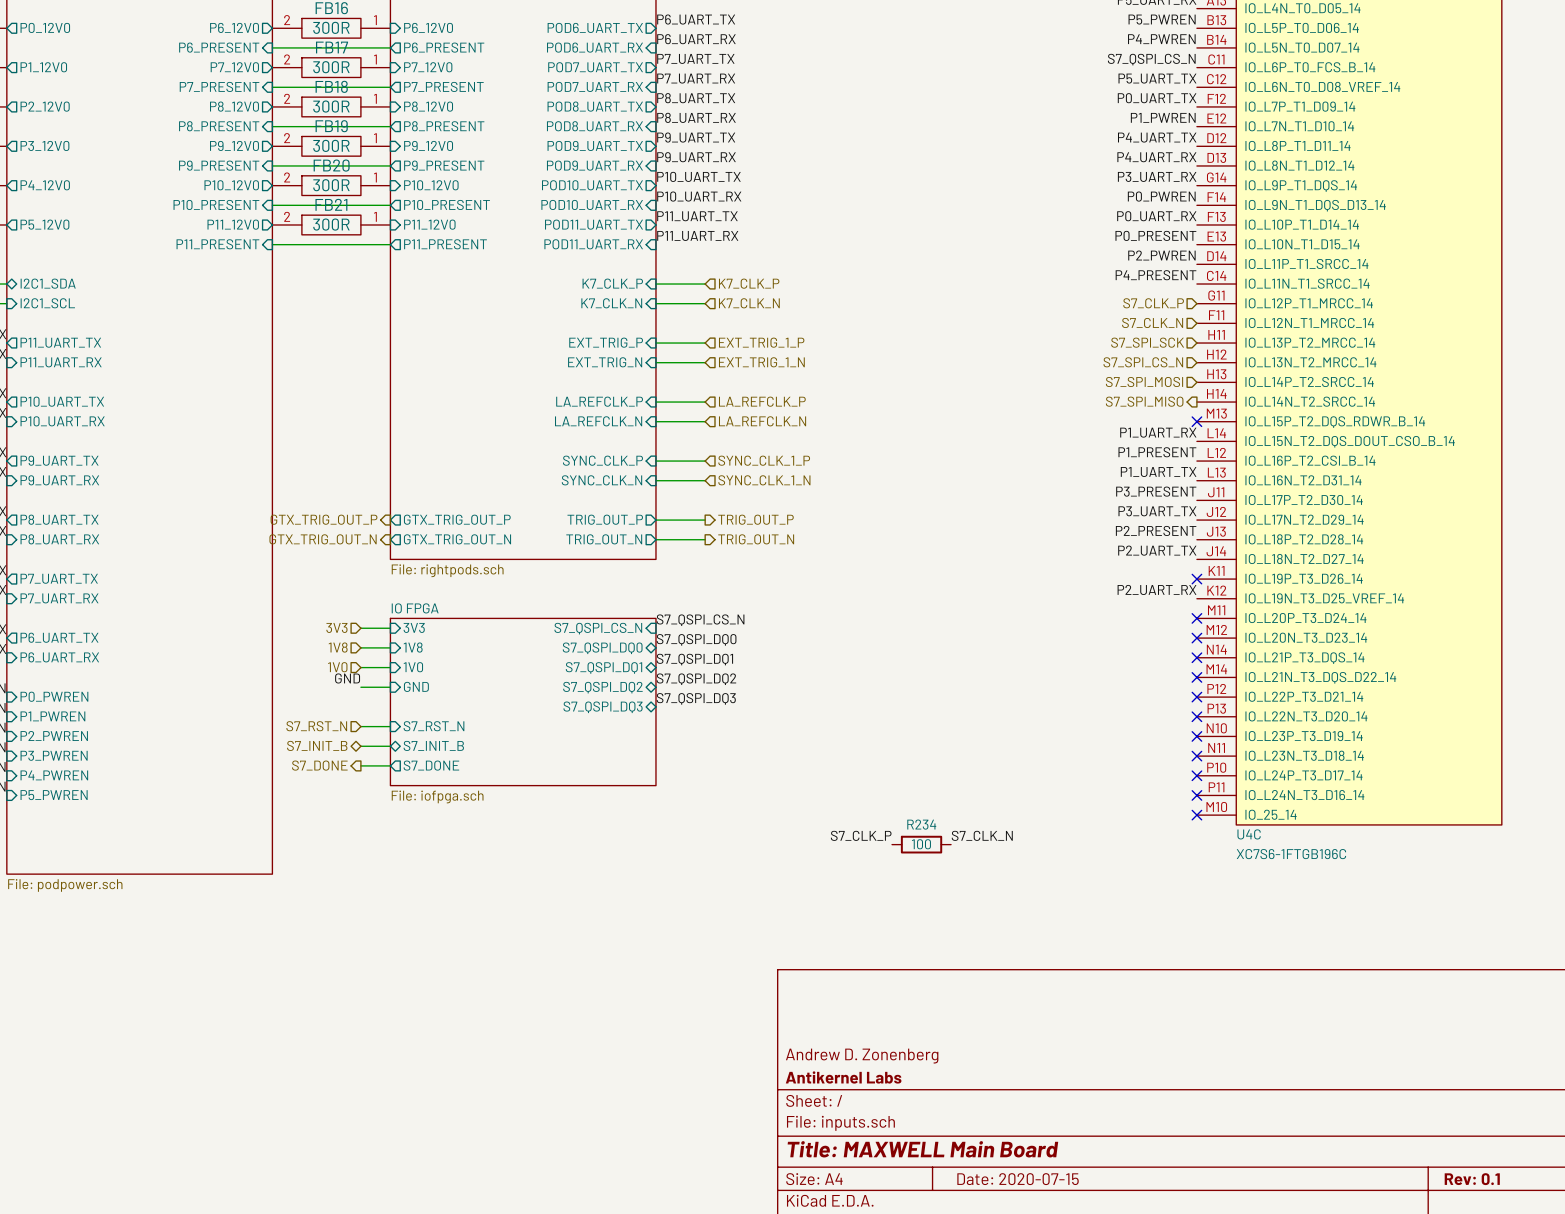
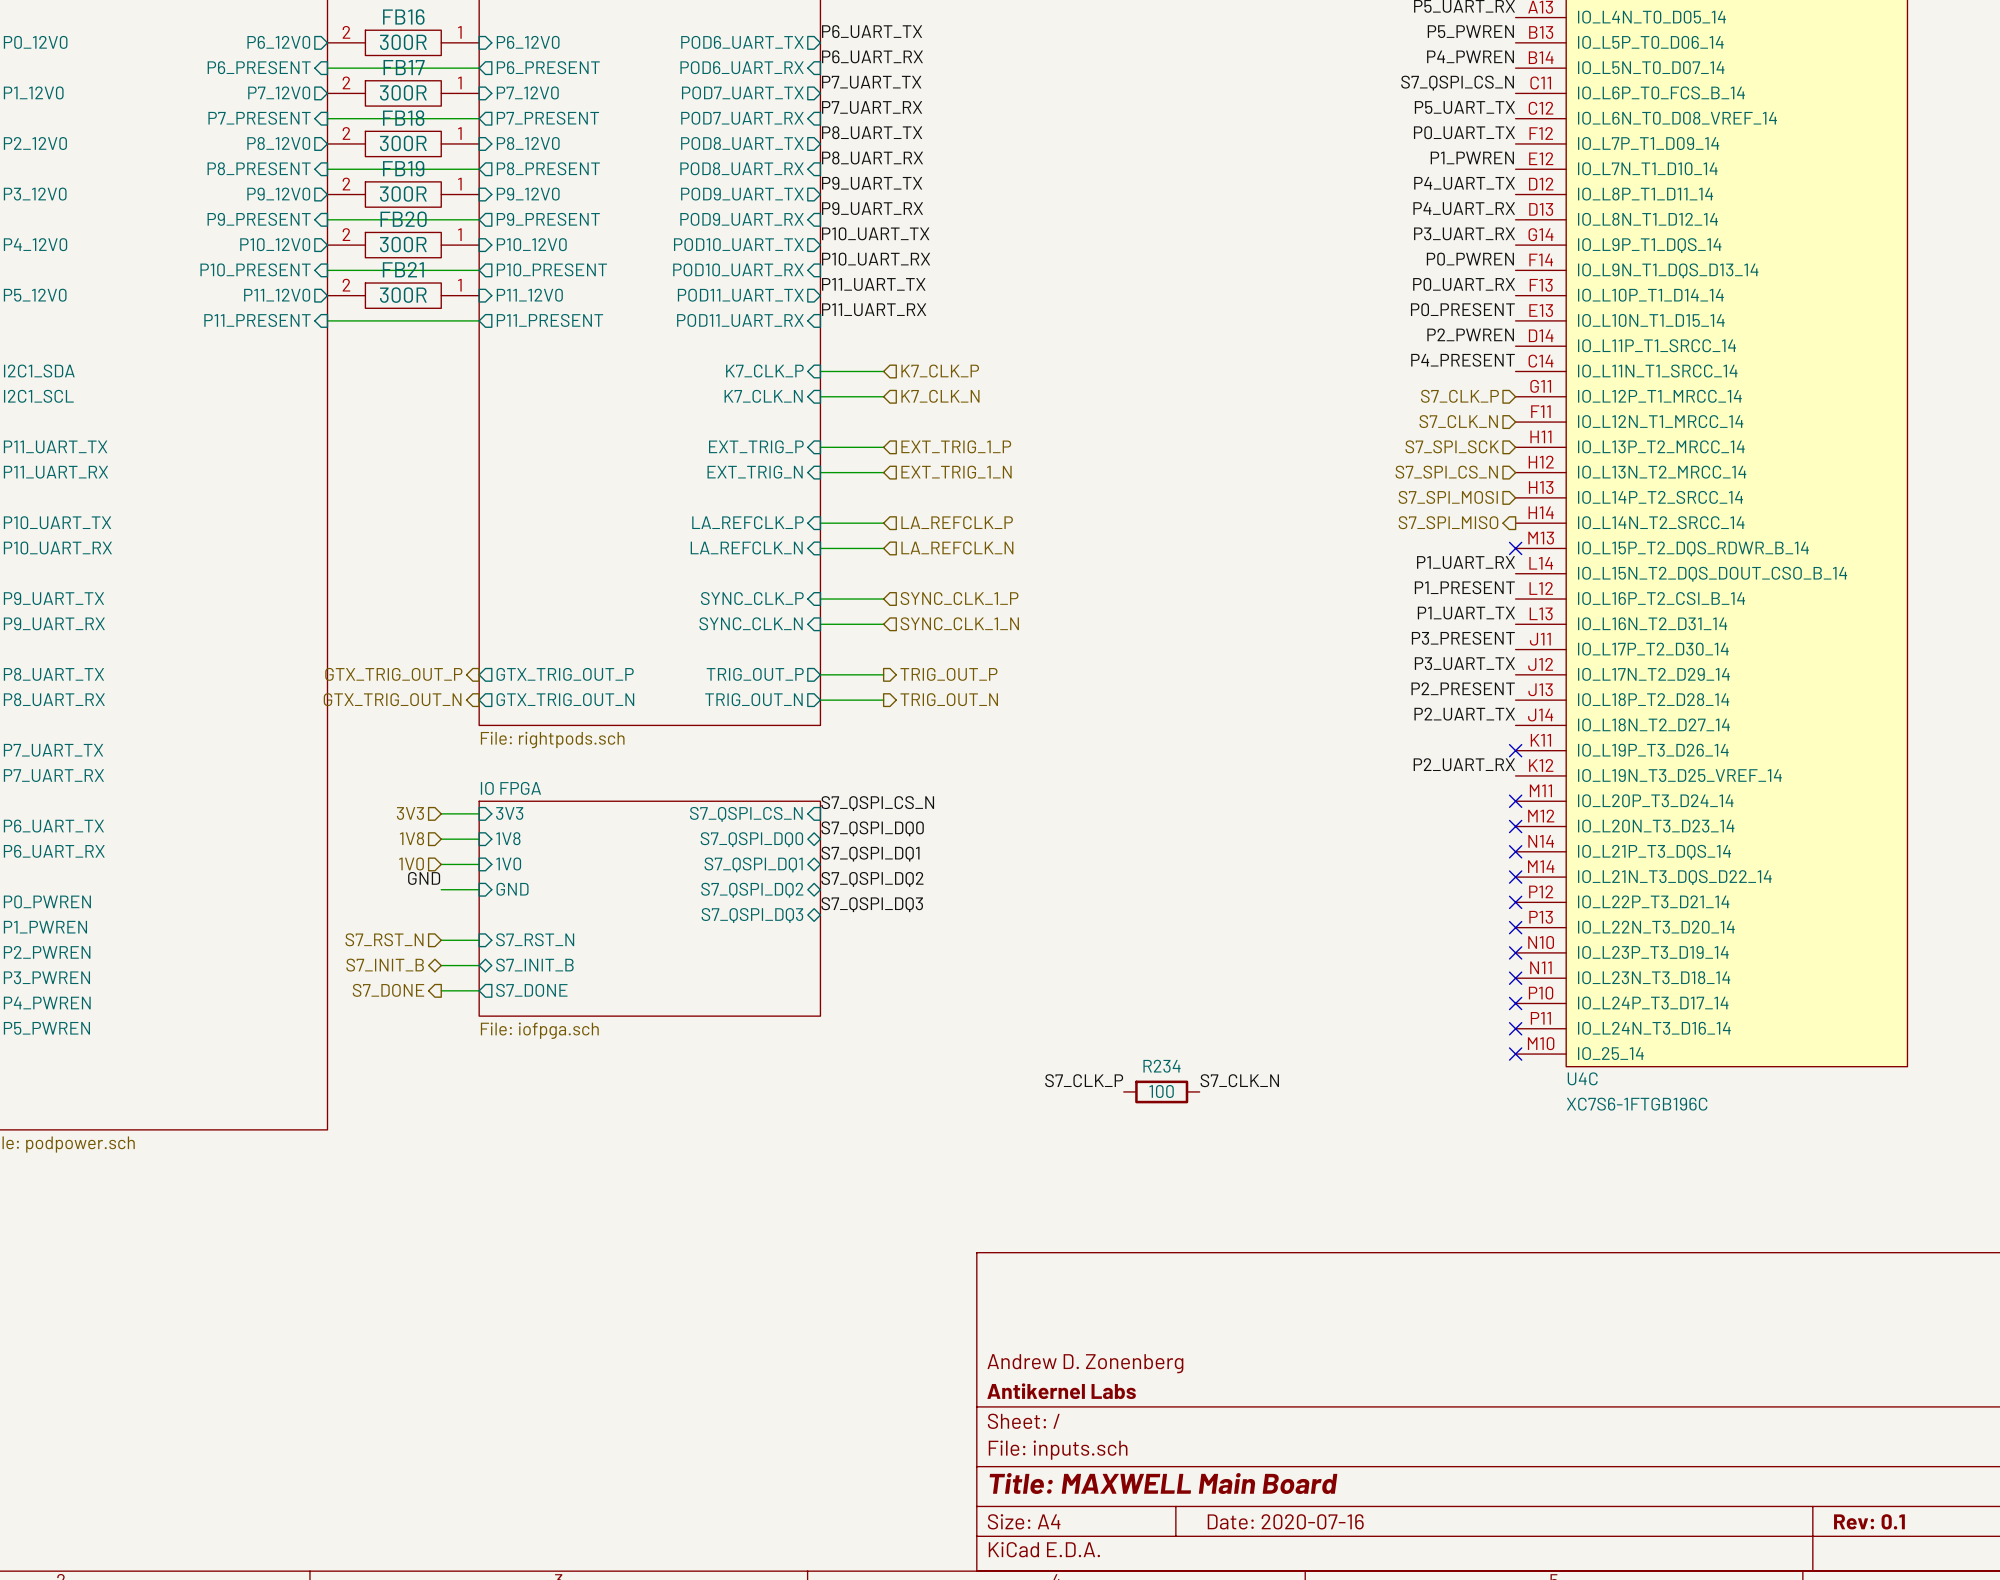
title block: Date: 2020-07-15 (1018, 1179) -> Date: 2020-07-16 (1285, 1521)

